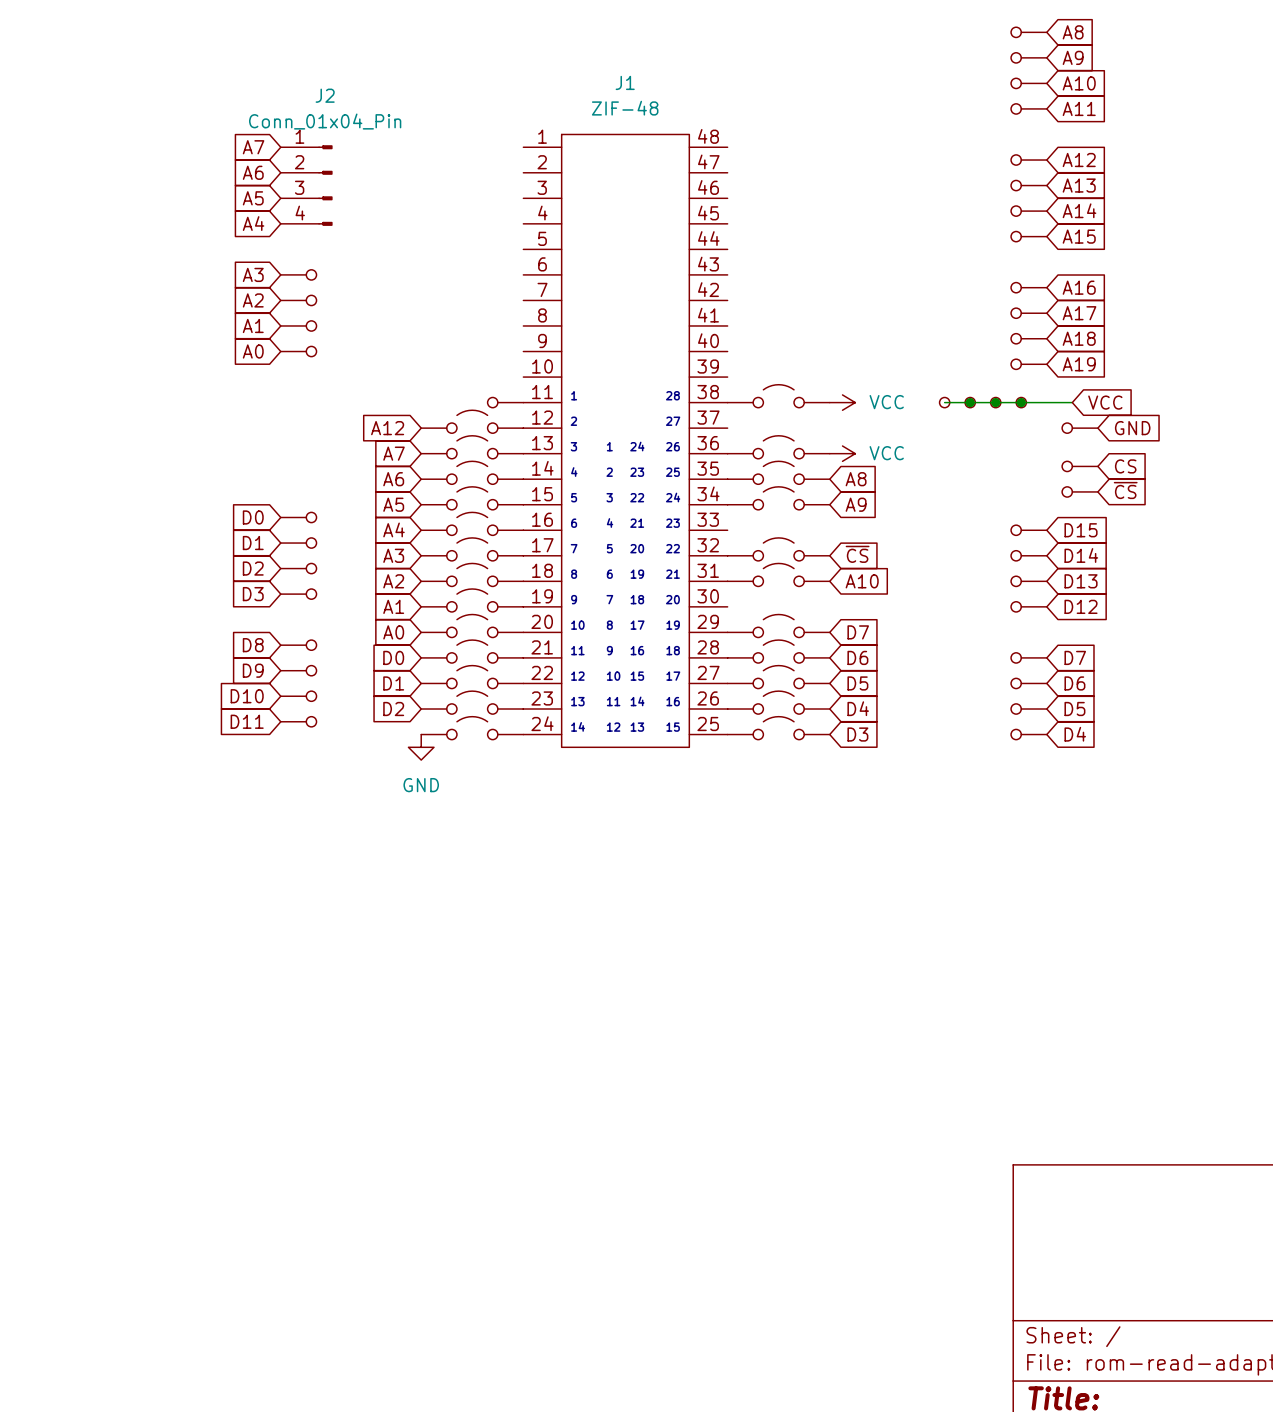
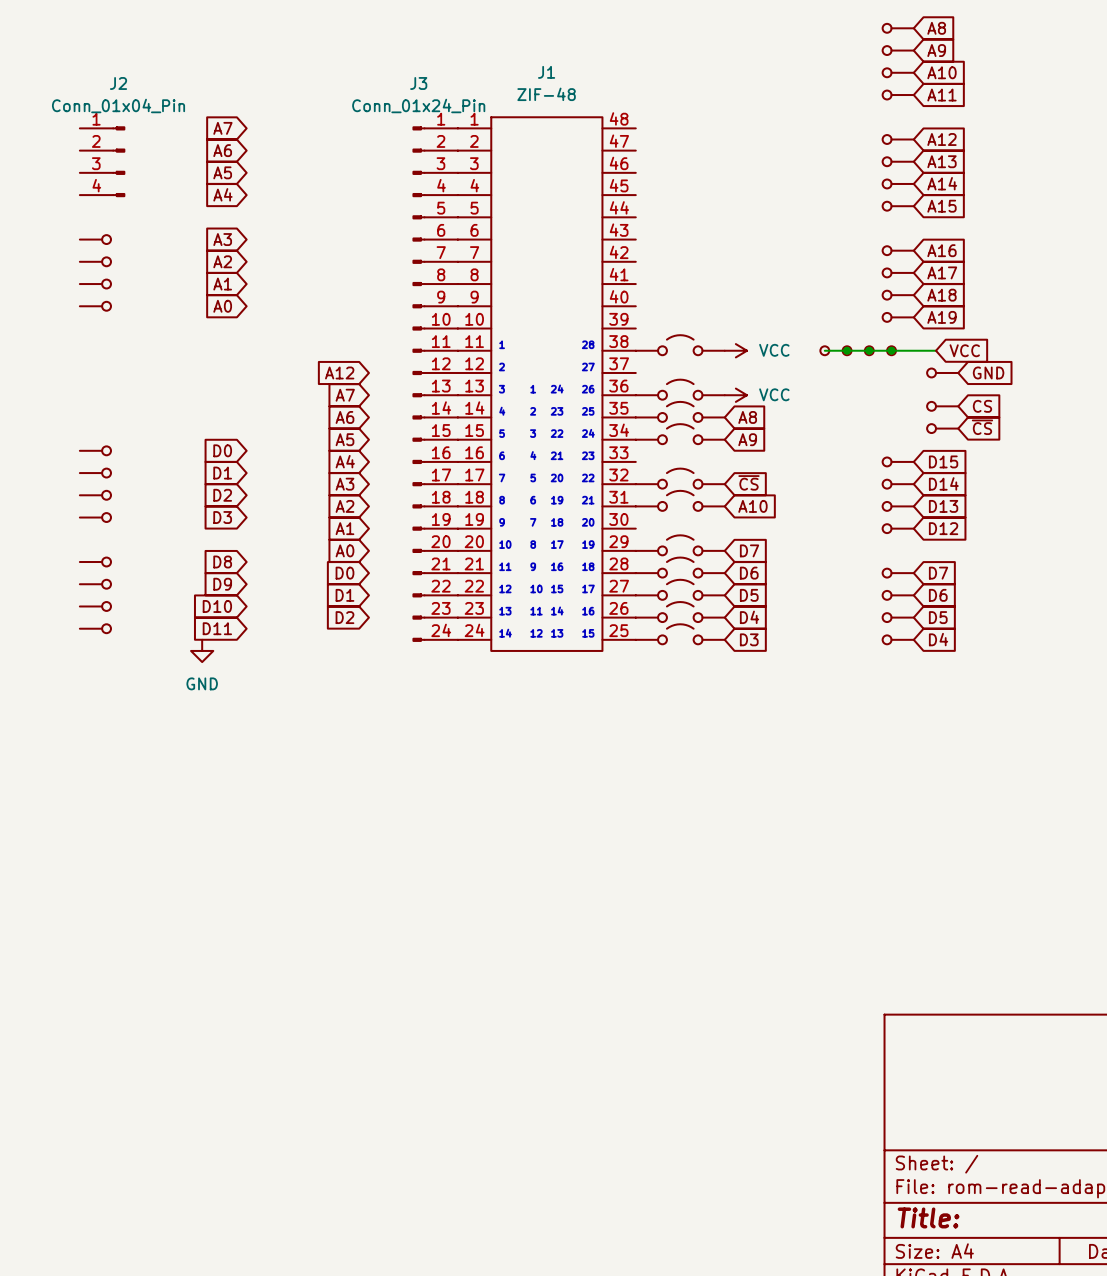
J2 position: (306, 185) -> (102, 161)
part: none -> (95, 239)
part: (298, 274) -> none
part: none -> (95, 261)
part: (298, 300) -> none
part: none -> (95, 284)
part: (298, 325) -> none
part: none -> (95, 306)
part: (298, 351) -> none
part: (505, 402) -> none
part: (472, 421) -> none
J3: none -> Conn_01x24_Pin (435, 384)
part: (472, 447) -> none
part: (472, 472) -> none
part: (472, 498) -> none
part: none -> (95, 450)
part: (298, 517) -> none
part: (472, 523) -> none
part: none -> (95, 473)
part: (298, 543) -> none
part: (472, 549) -> none
part: none -> (95, 495)
part: (298, 568) -> none
part: (472, 574) -> none
part: none -> (95, 517)
part: (298, 594) -> none
part: (472, 600) -> none
part: (472, 626) -> none
part: none -> (95, 562)
part: (298, 645) -> none
part: (472, 651) -> none
part: none -> (95, 584)
part: (298, 670) -> none
part: (472, 677) -> none
part: none -> (95, 606)
part: (298, 696) -> none
part: (472, 702) -> none
part: none -> (95, 628)
part: (298, 721) -> none
part: (472, 728) -> none
power symbol position: GND (421, 747) -> GND (202, 650)

